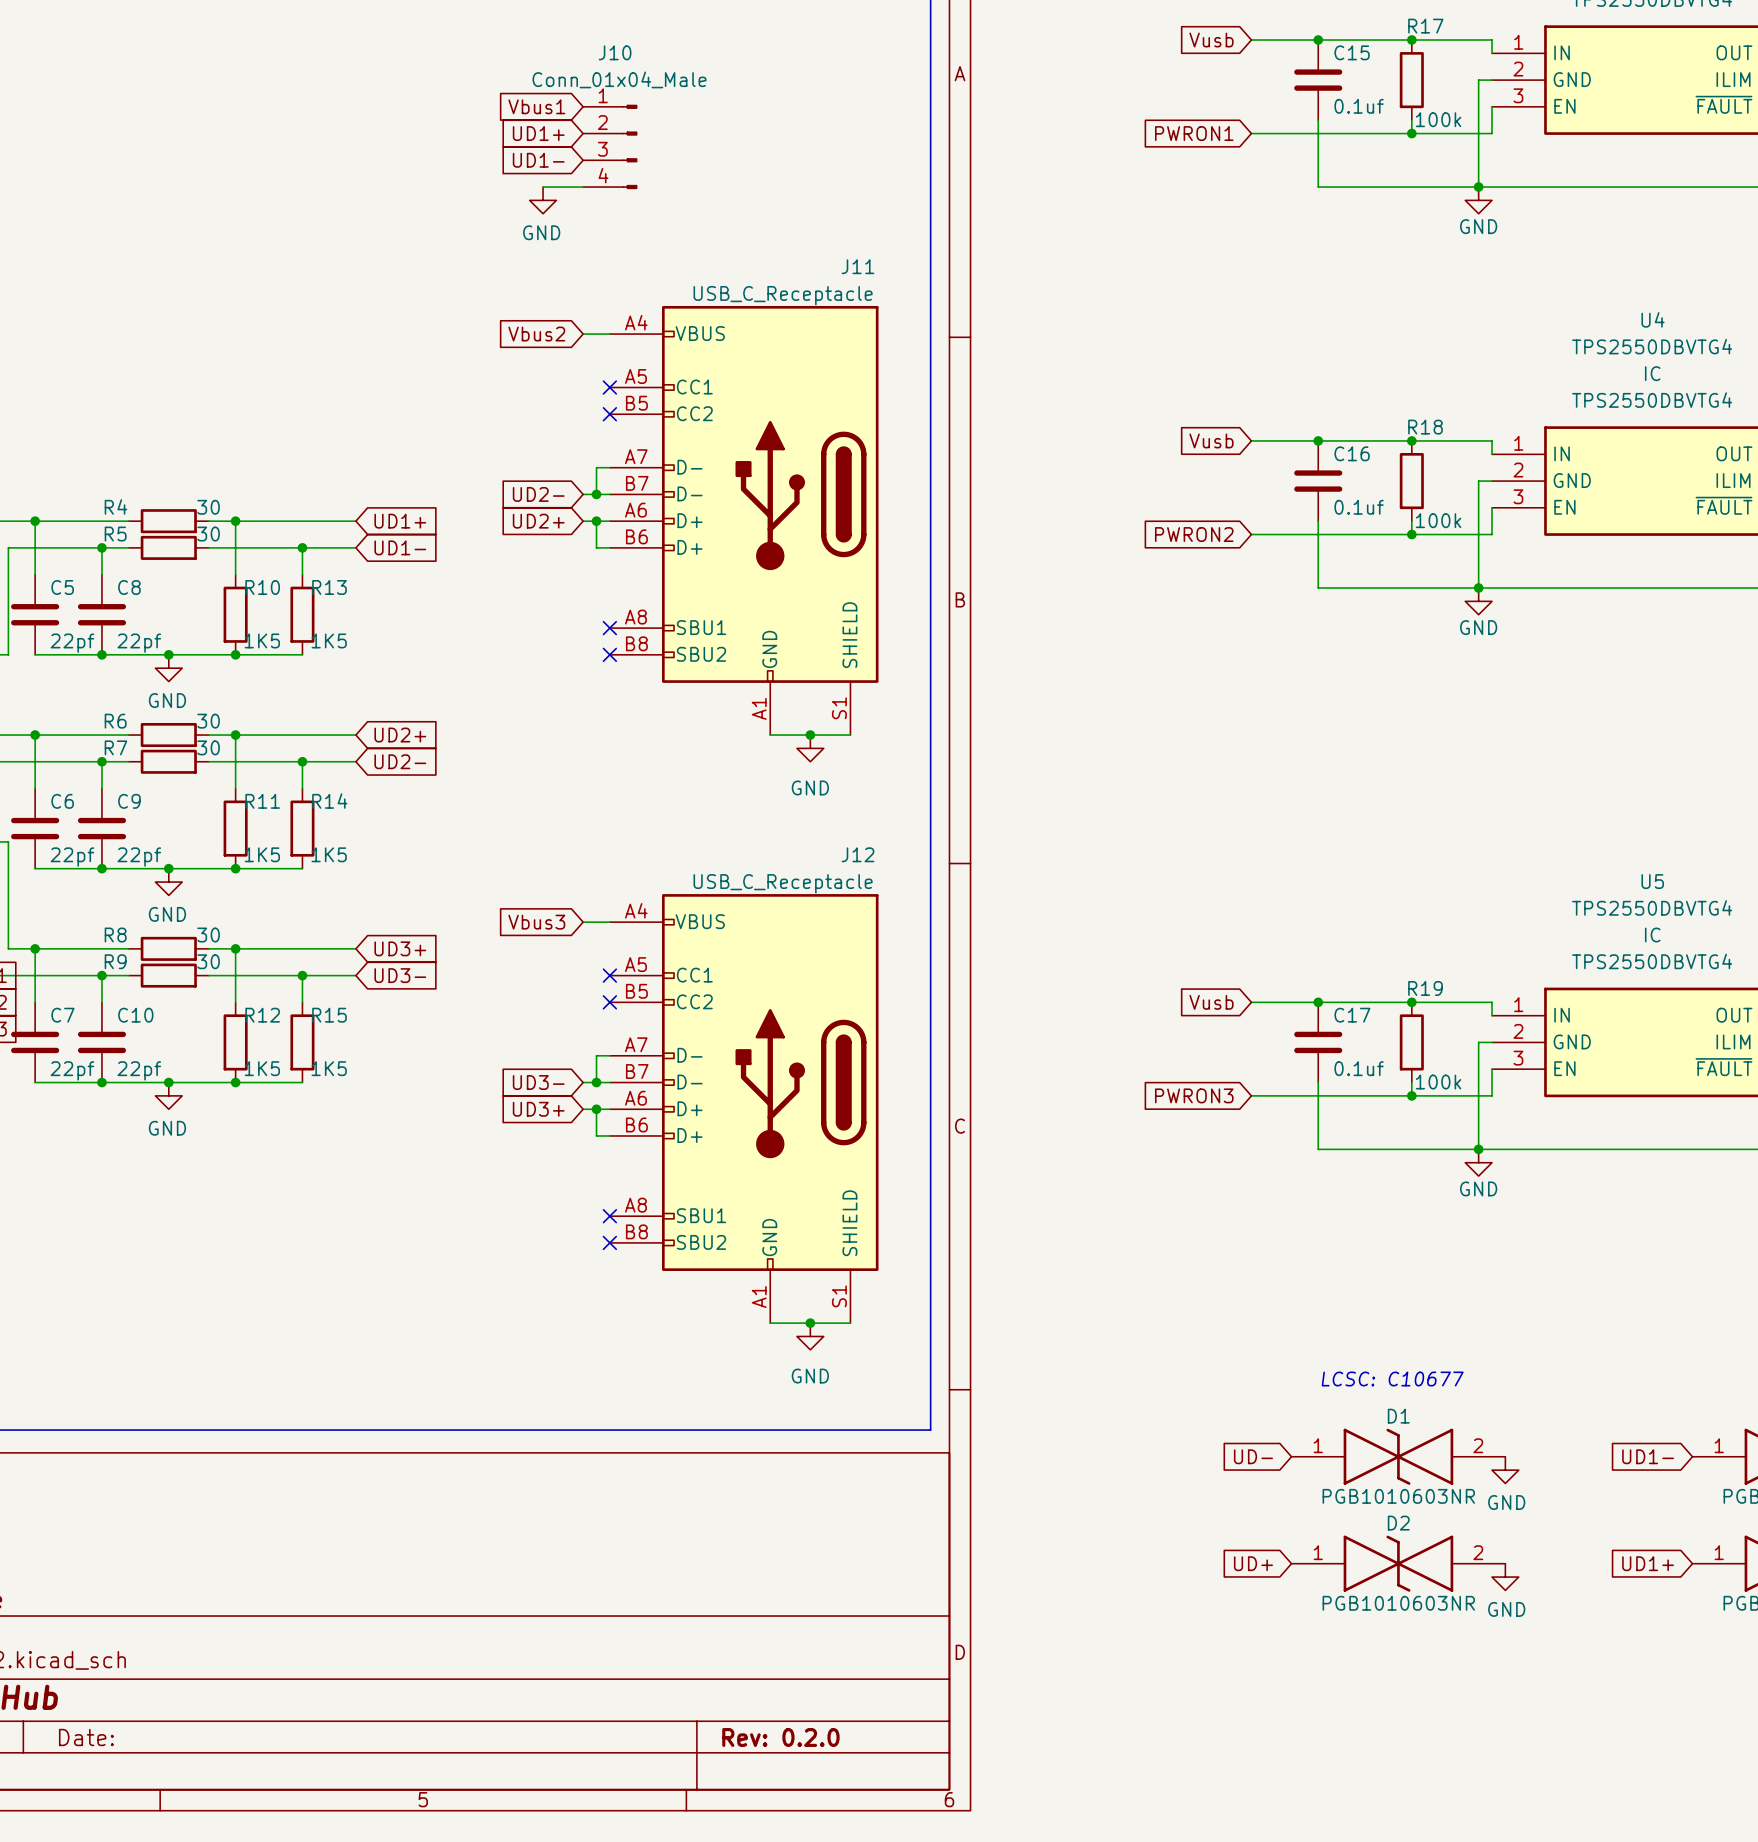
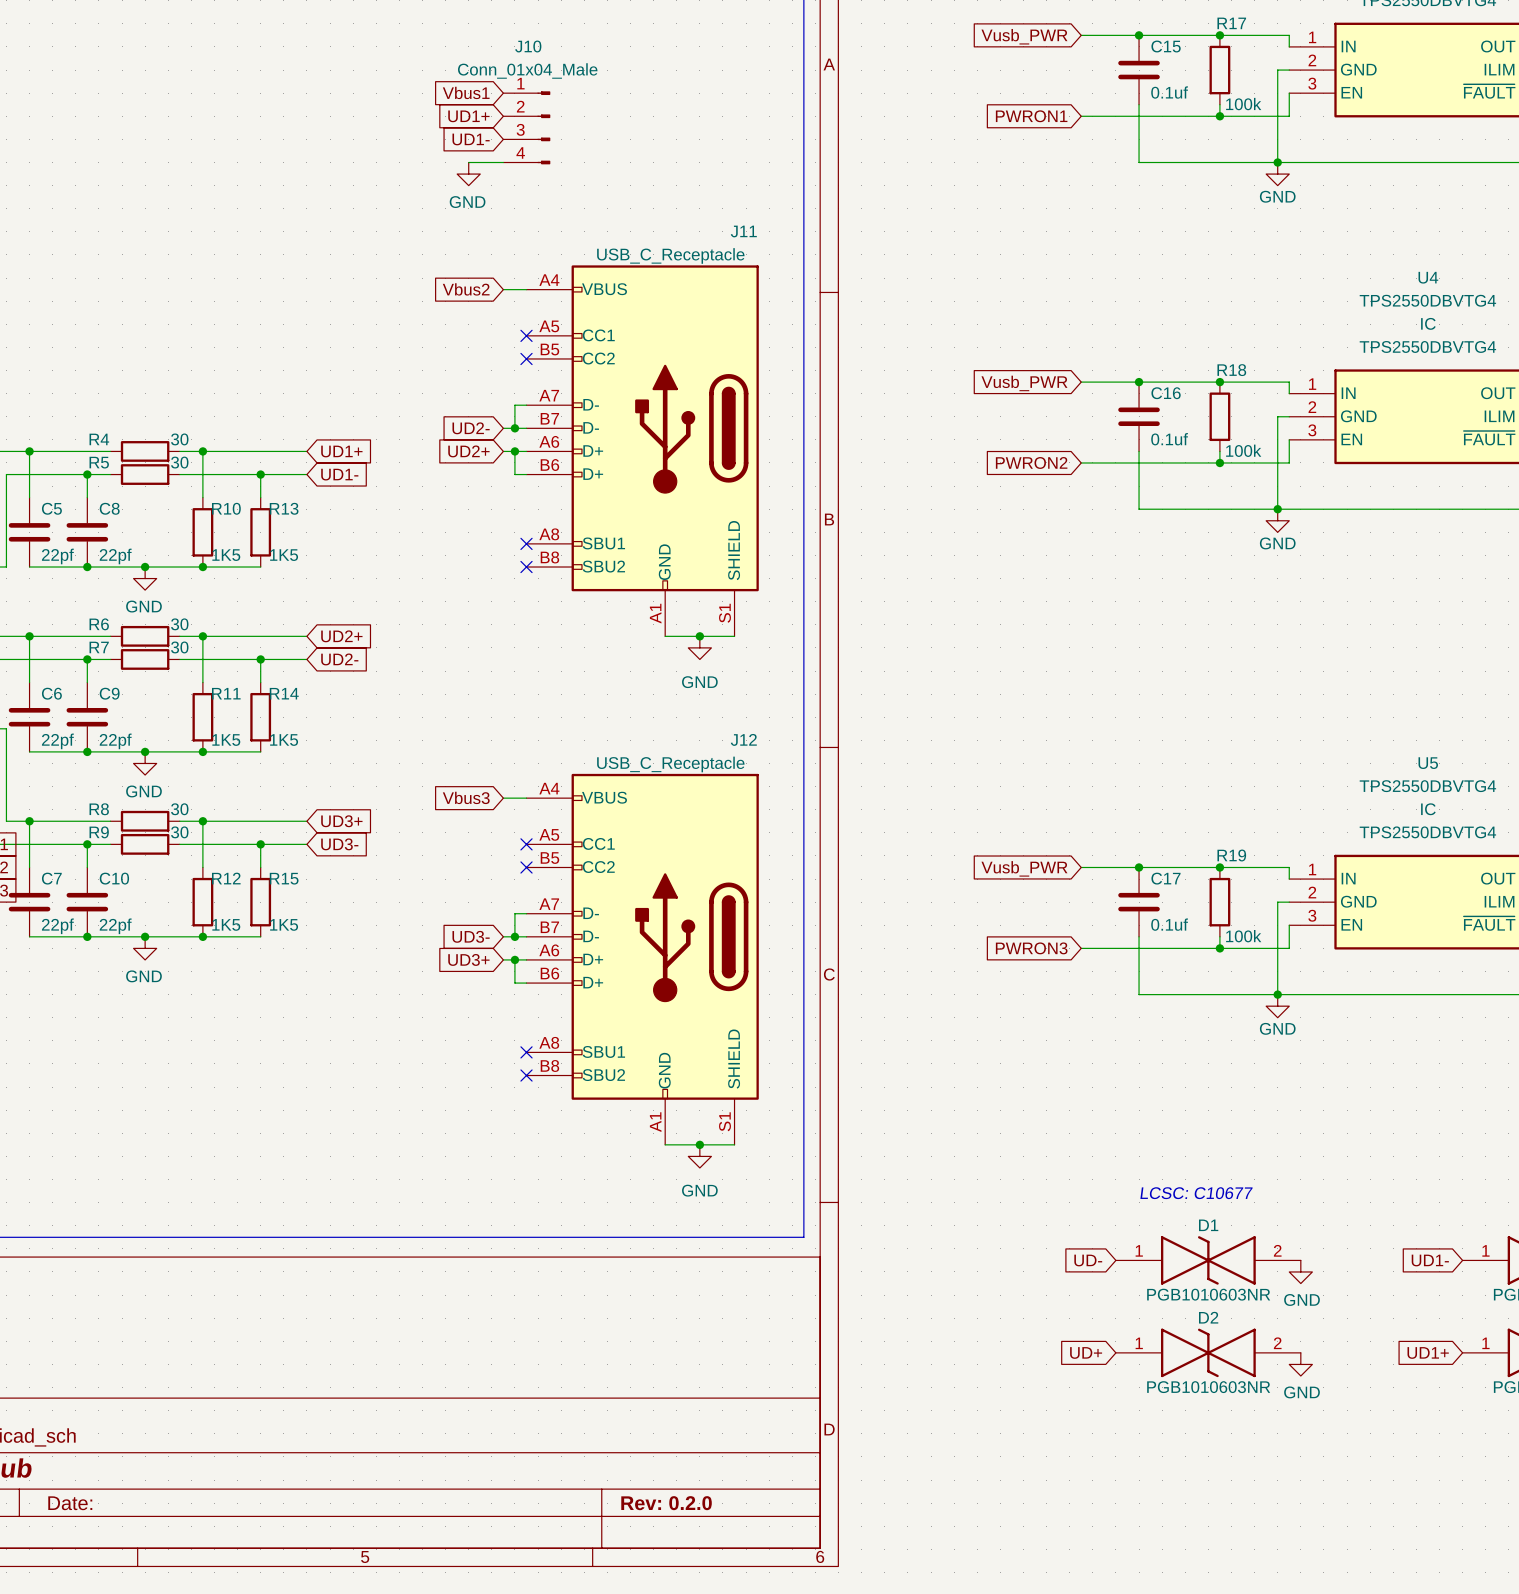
global label: Vusb (1211, 40) -> Vusb_PWR (1024, 36)
global label: Vusb (1211, 440) -> Vusb_PWR (1024, 383)
global label: Vusb (1211, 1002) -> Vusb_PWR (1024, 868)

